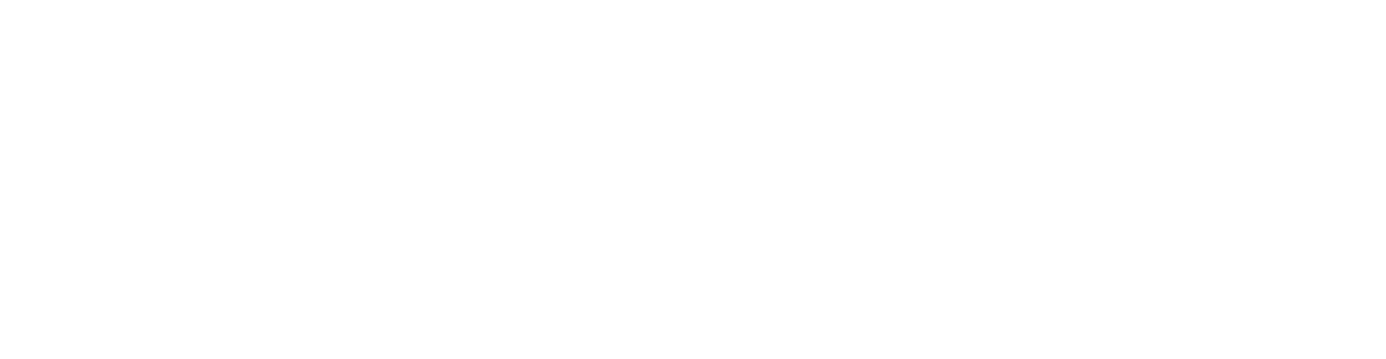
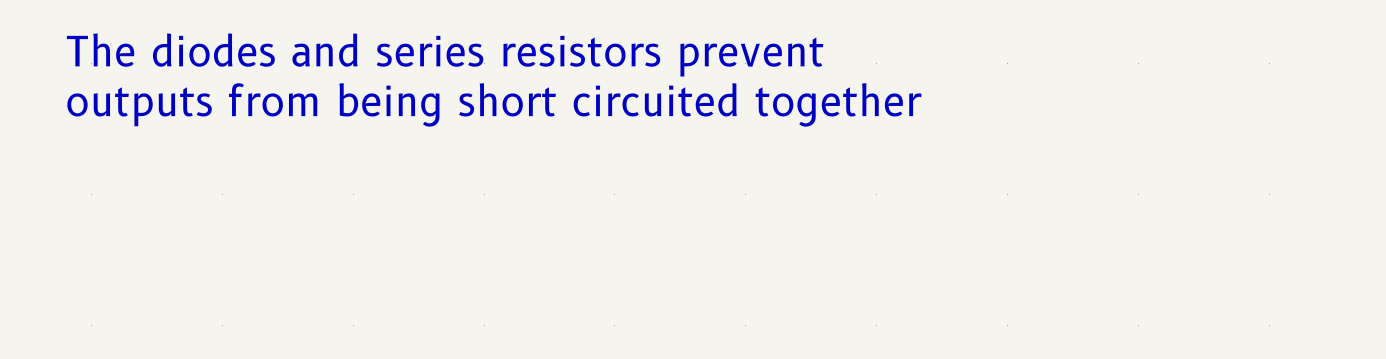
text: none -> The diodes and series resistors prevent (445, 54)
text: none -> outputs from being short circuited together (494, 104)

